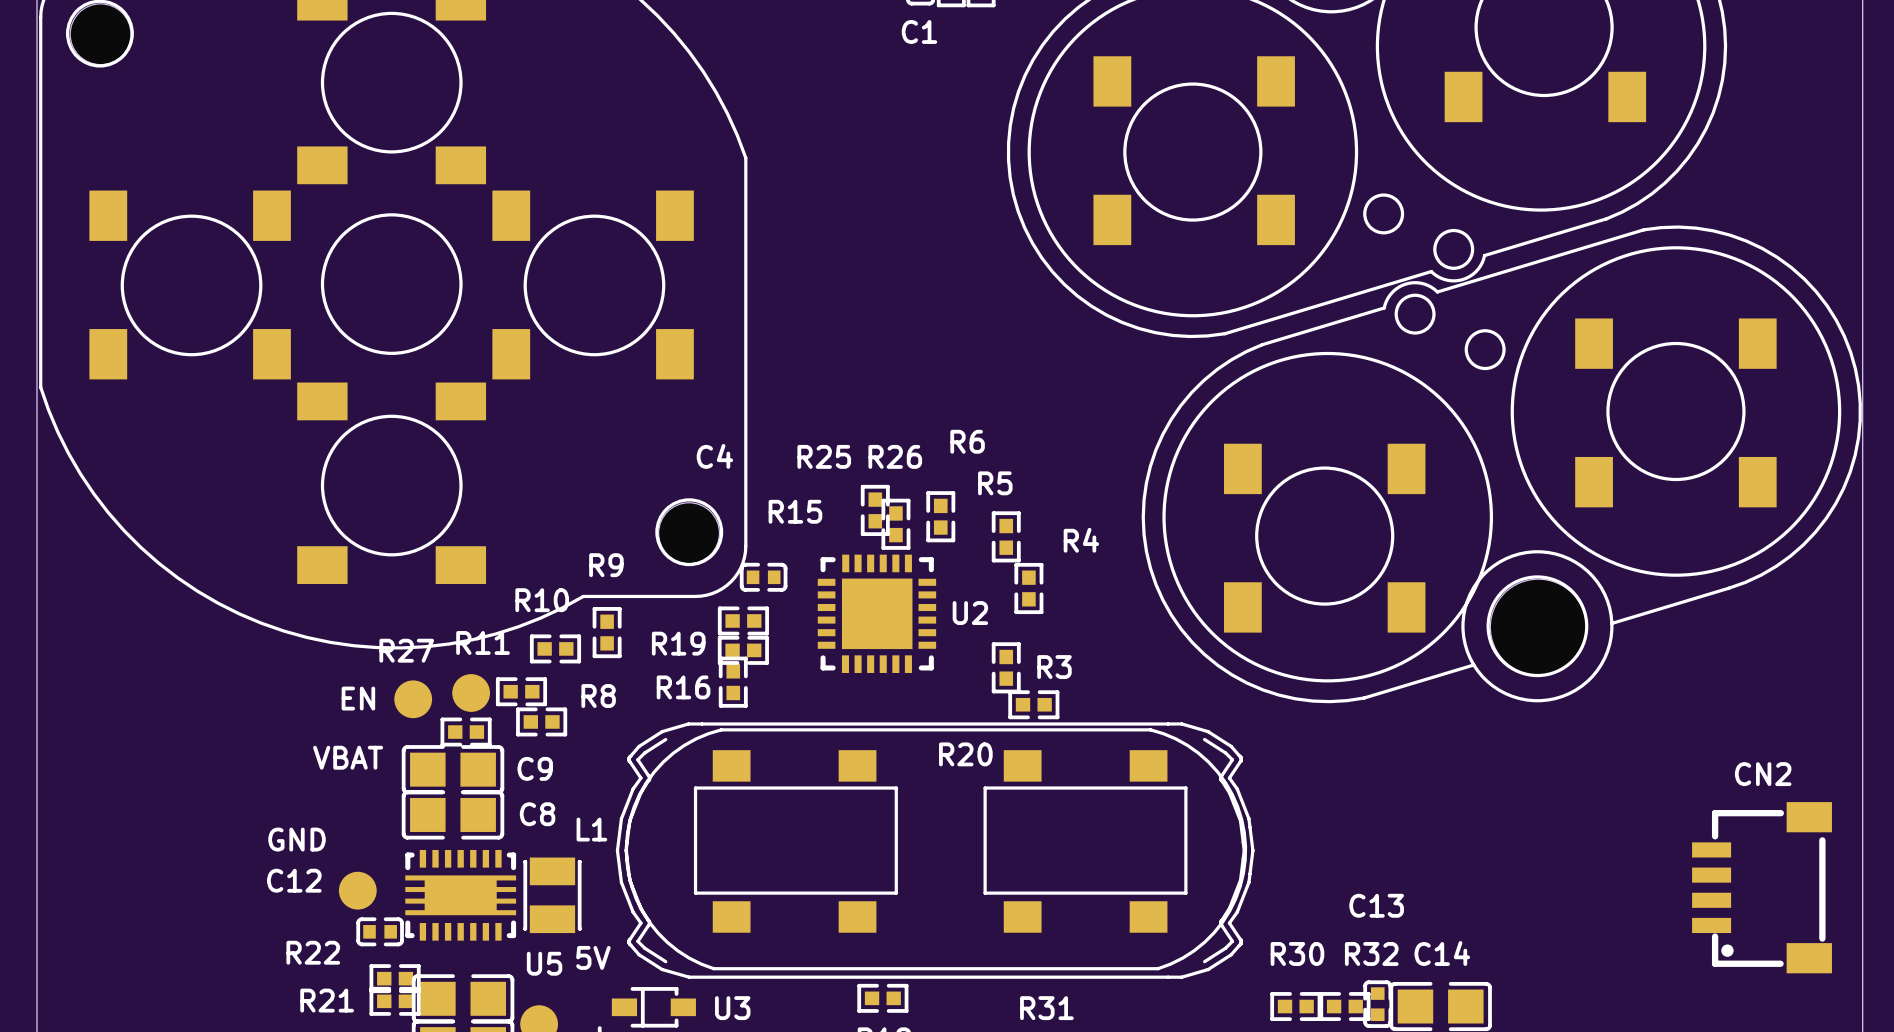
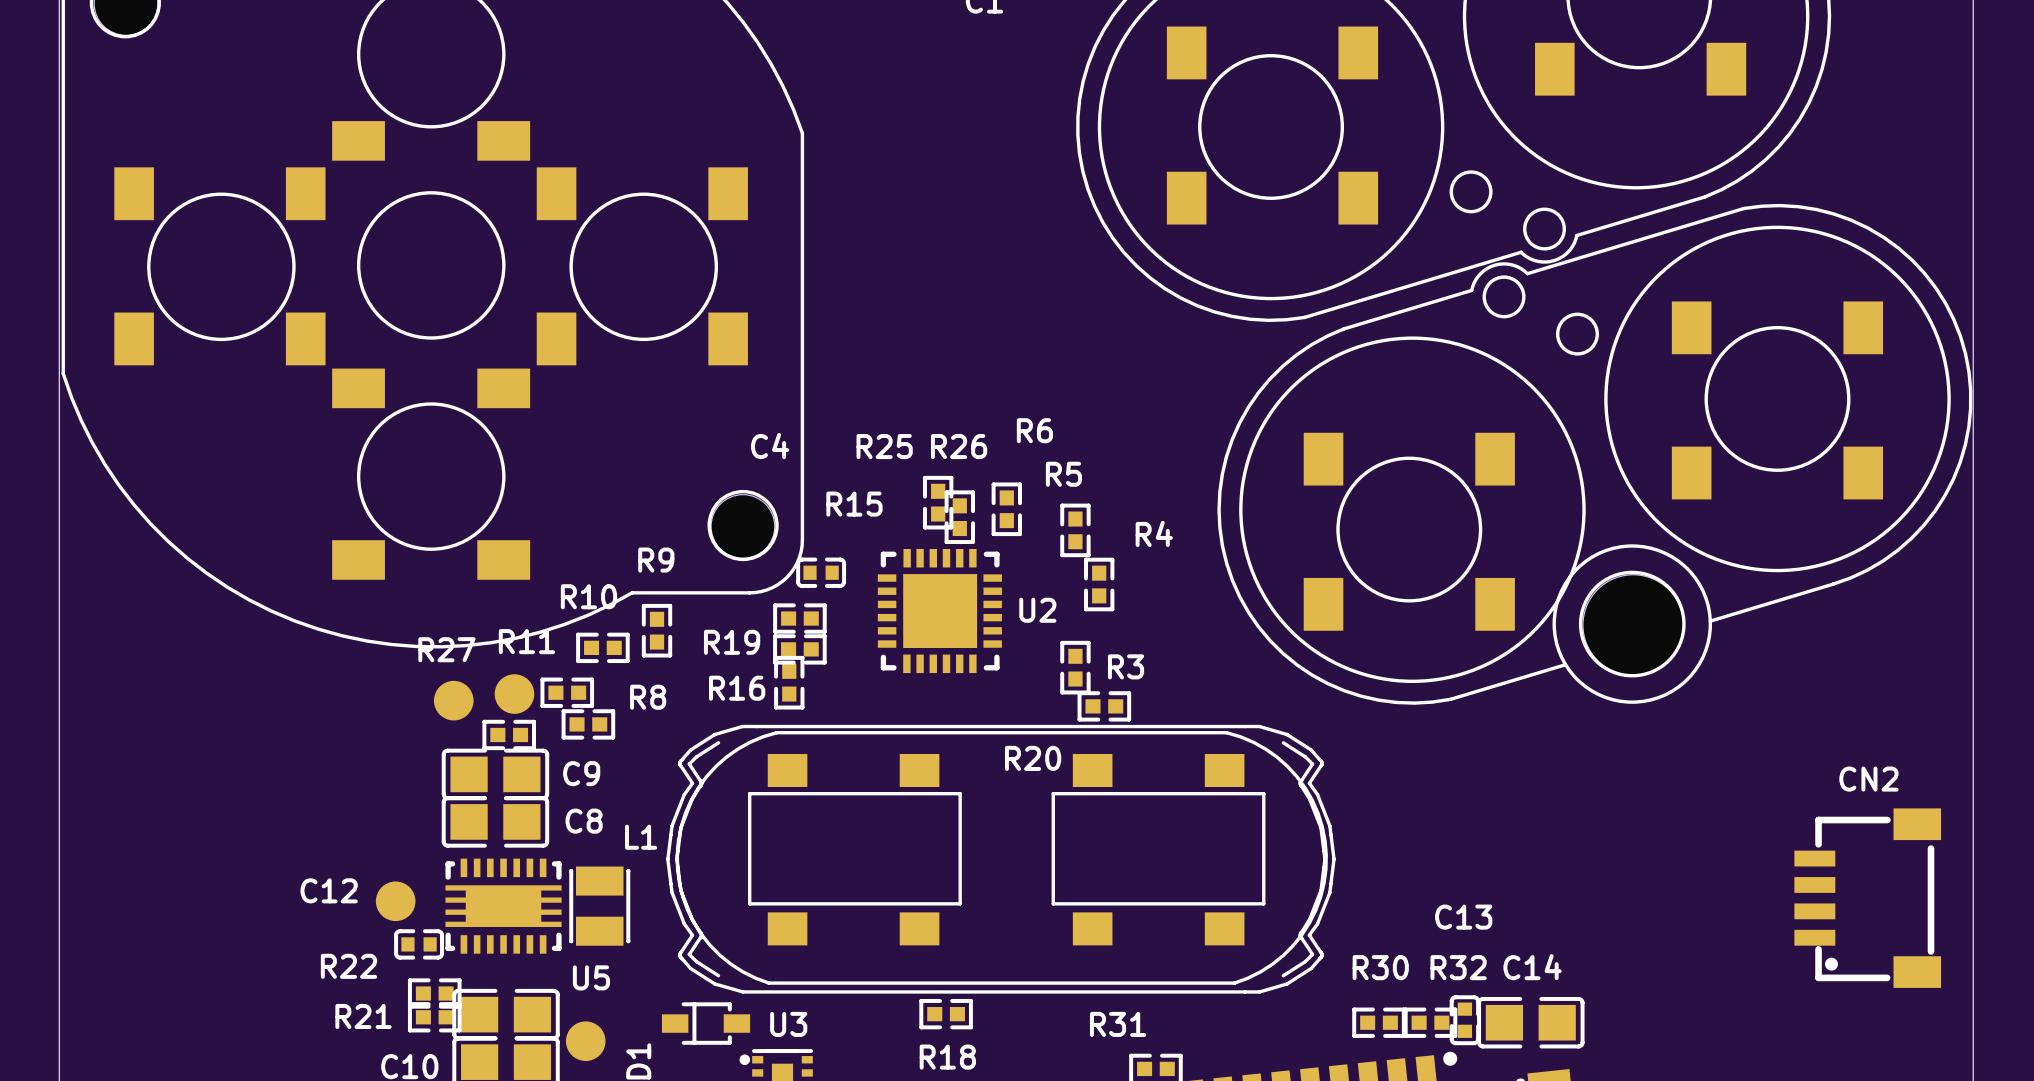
text: EN (358, 698) -> none
text: VBAT (348, 757) -> none
text: GND (297, 839) -> none
text: 5V (593, 957) -> none

